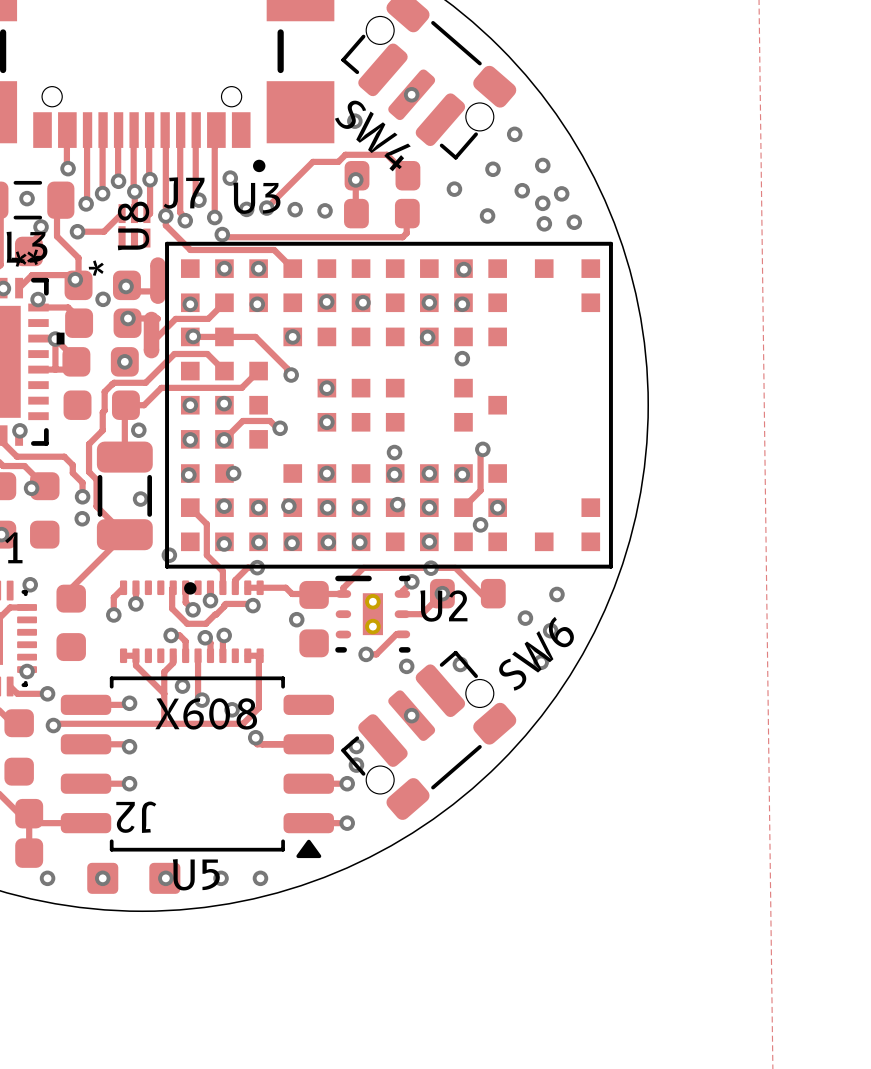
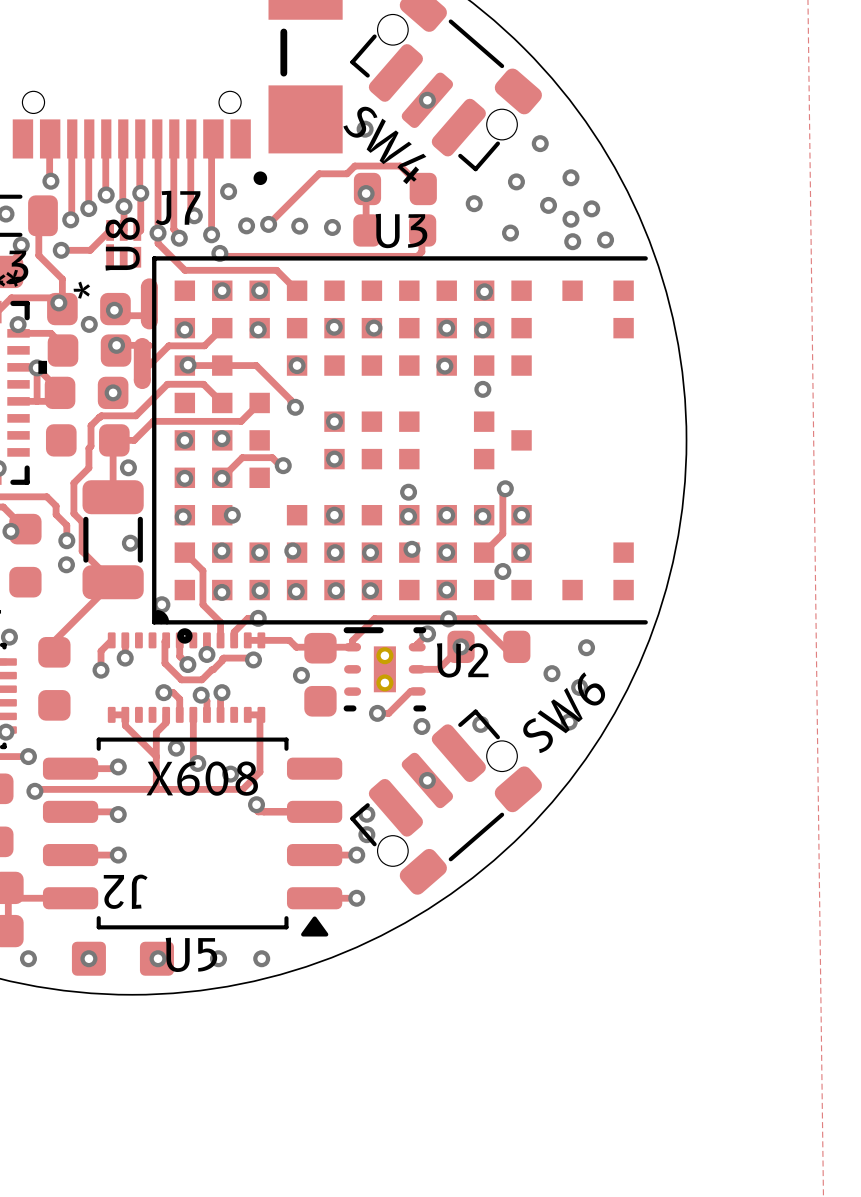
U3 name position: U3 (256, 198) -> U3 (401, 230)
U3 footprint: [165, 241, 613, 595] -> [152, 256, 648, 644]
via: none -> (521, 515)

